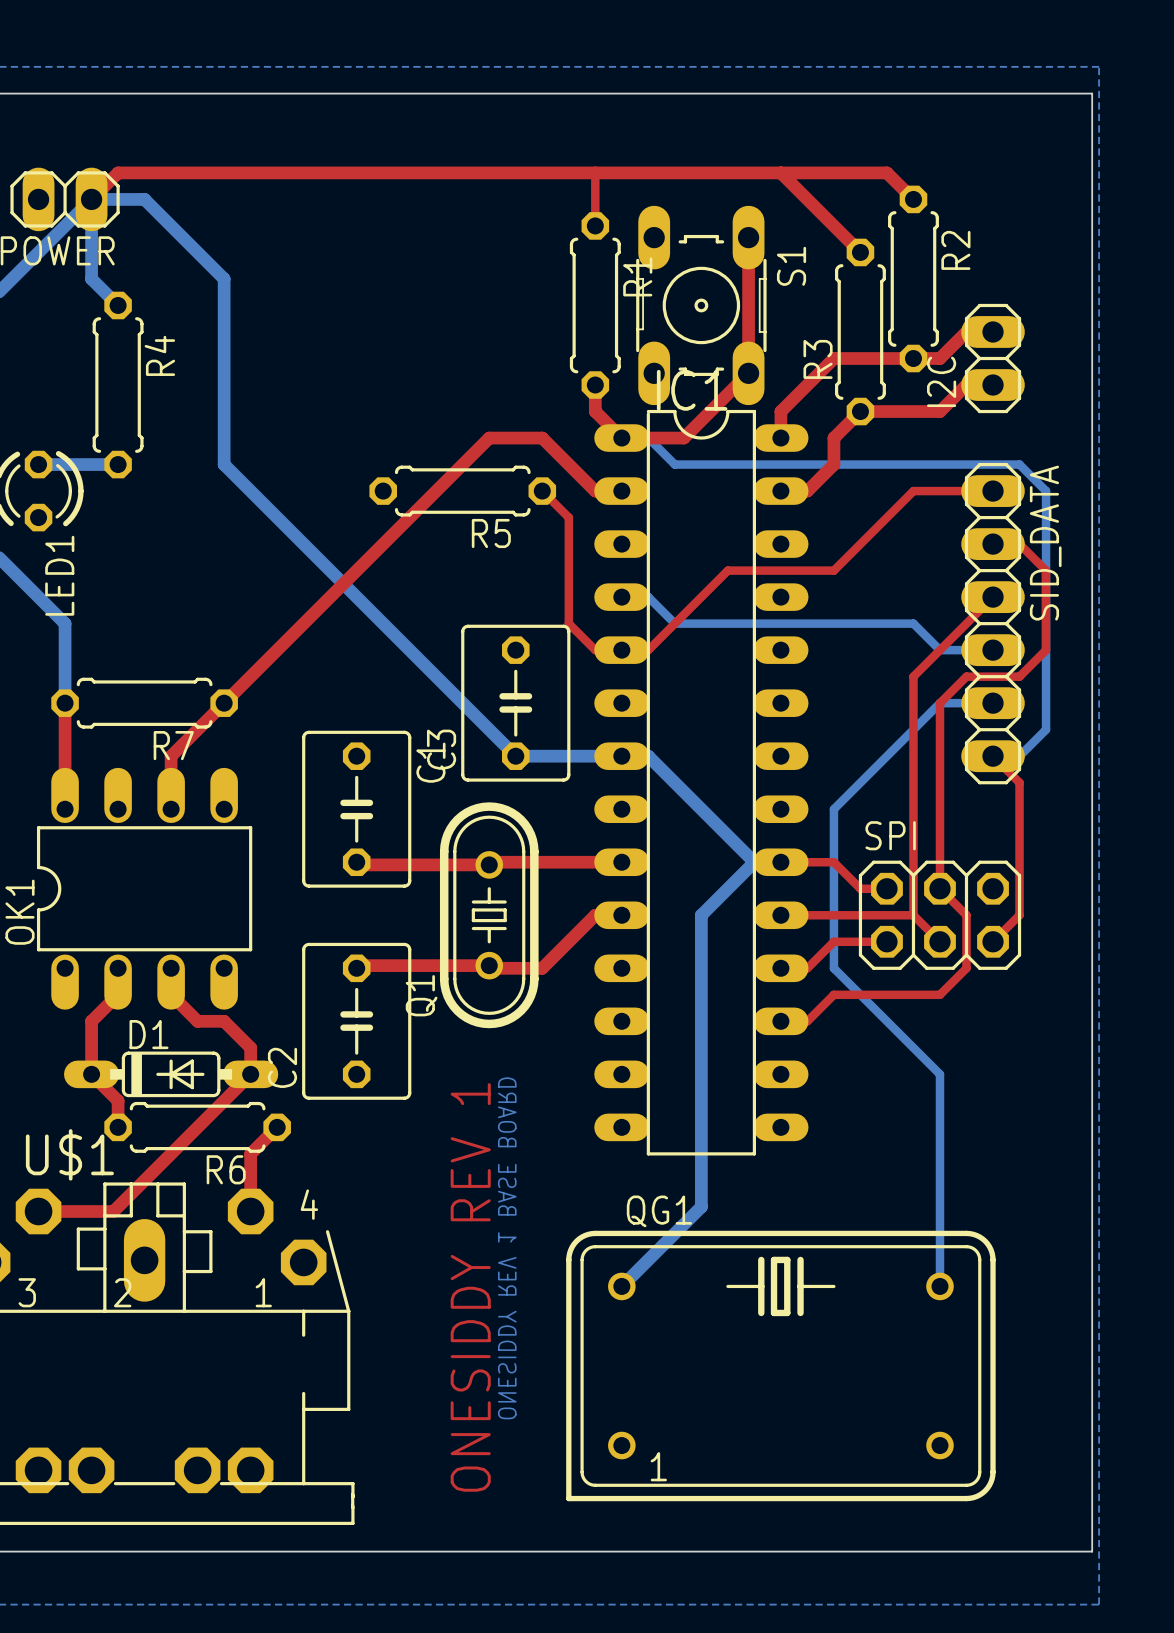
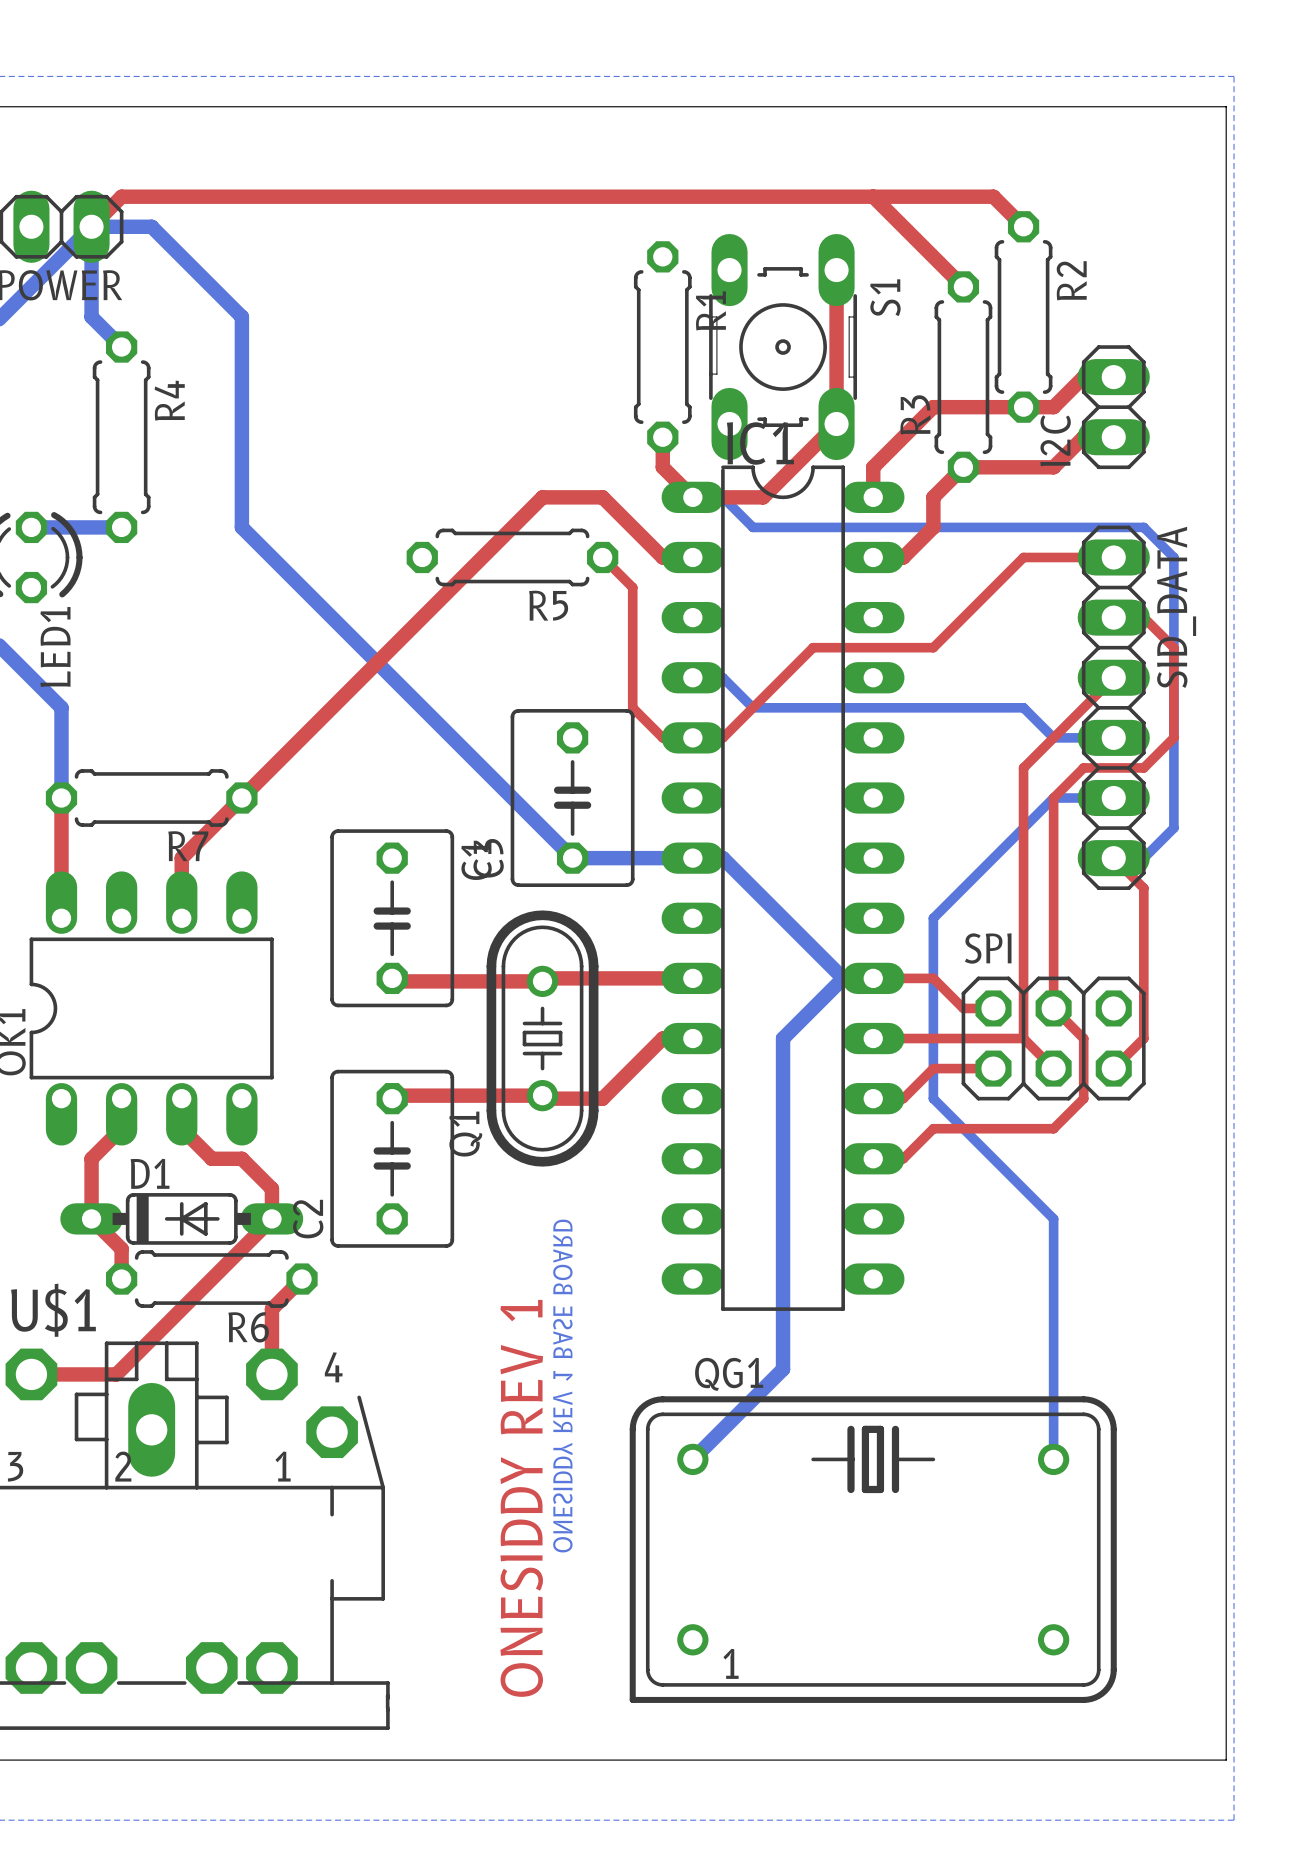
top track: (595, 172) (595, 225) -> none

